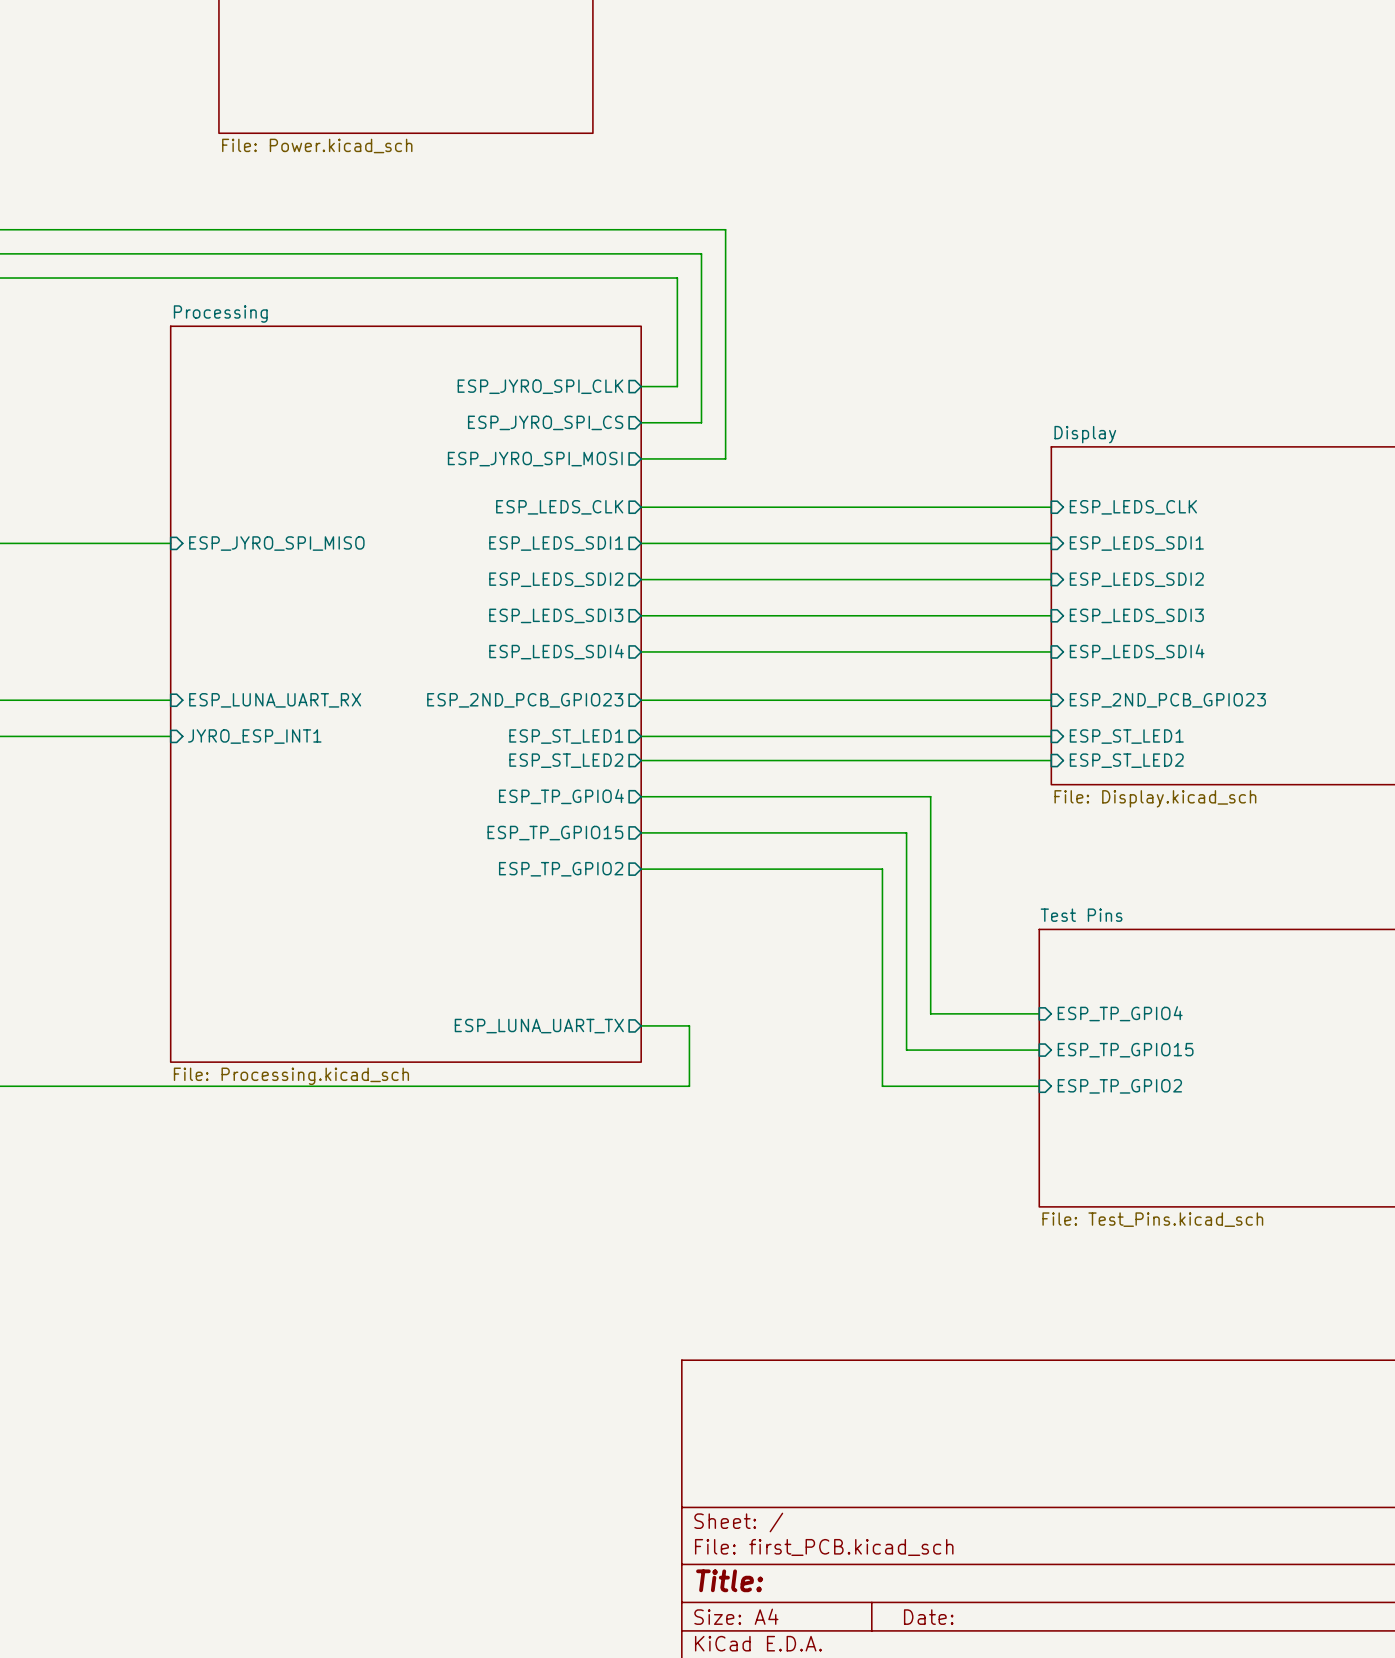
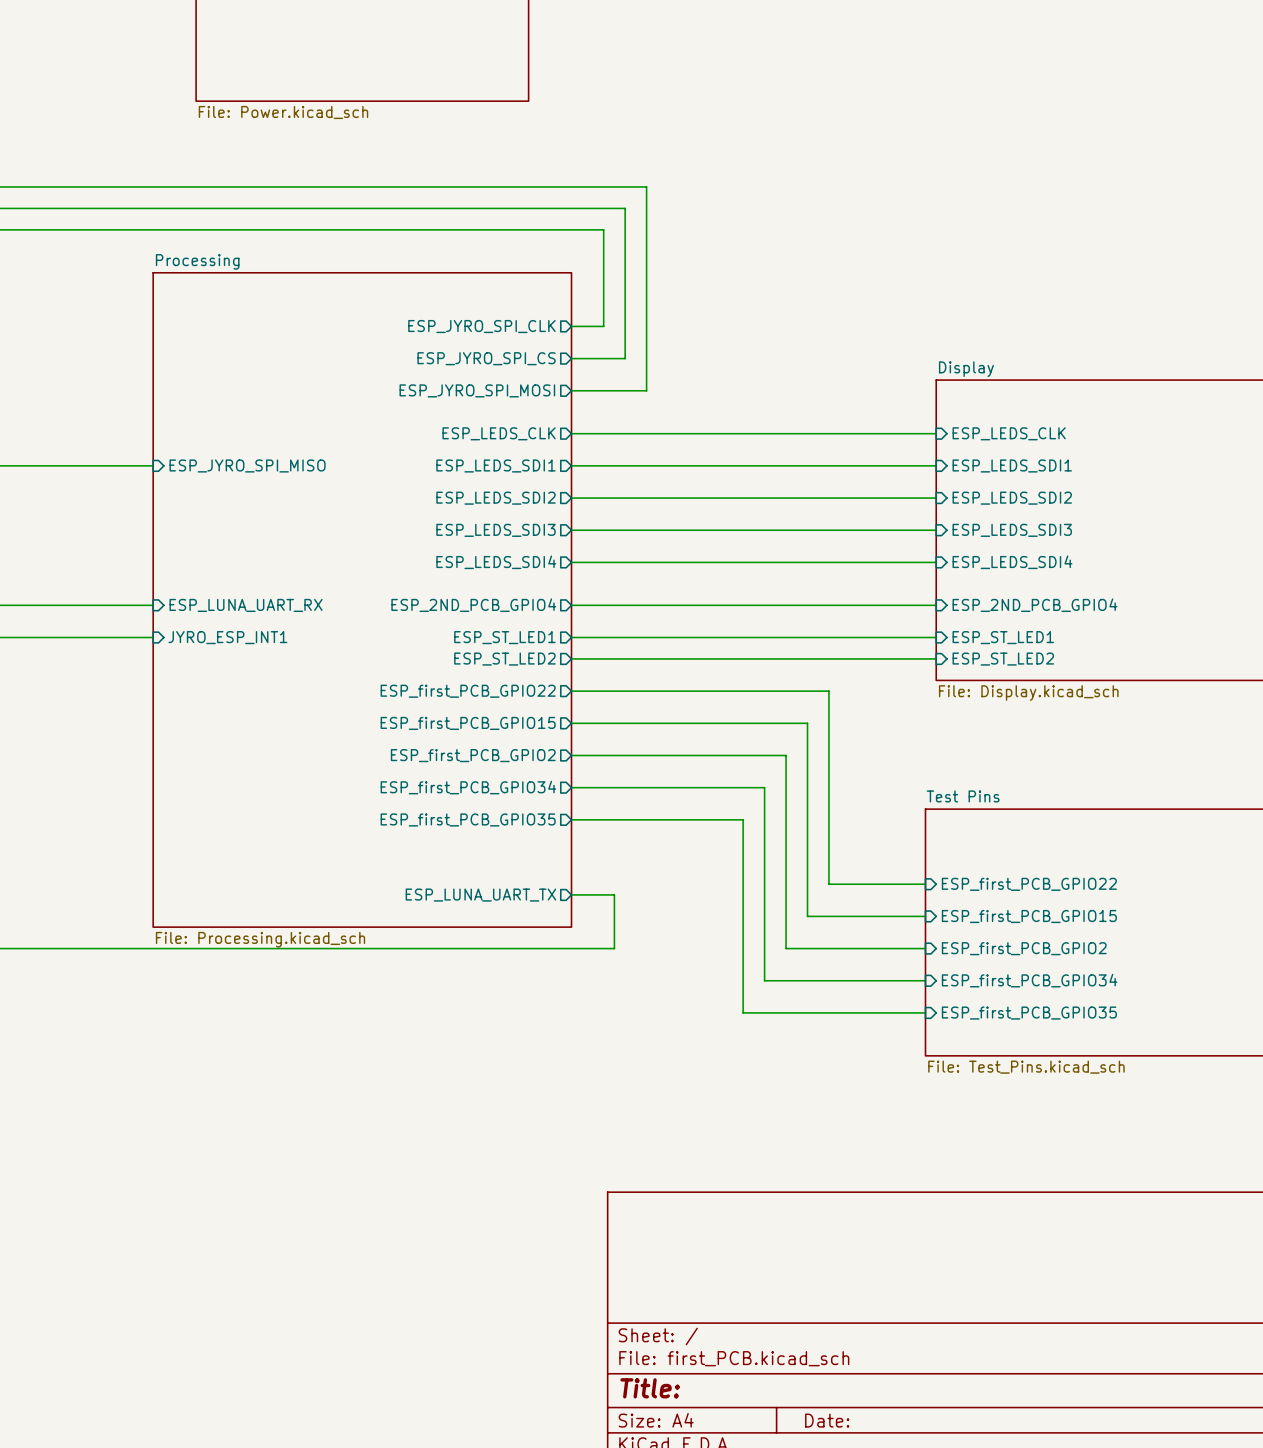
sheet pin: ESP_2ND_PCB_GPIO23 (525, 700) -> ESP_2ND_PCB_GPIO4 (473, 605)
sheet pin: ESP_2ND_PCB_GPIO23 (1167, 700) -> ESP_2ND_PCB_GPIO4 (1034, 605)
sheet pin: ESP_TP_GPIO4 (561, 796) -> ESP_first_PCB_GPIO22 (468, 691)
sheet pin: ESP_TP_GPIO15 (555, 833) -> ESP_first_PCB_GPIO15 (468, 723)
sheet pin: ESP_TP_GPIO2 (561, 869) -> ESP_first_PCB_GPIO2 (473, 755)
sheet pin: none -> ESP_first_PCB_GPIO34 (468, 787)
wire: none -> (571, 787) (764, 787) (764, 980) (925, 980)
sheet pin: none -> ESP_first_PCB_GPIO35 (468, 819)
wire: none -> (571, 819) (743, 819) (743, 1012) (925, 1012)
sheet pin: ESP_TP_GPIO4 (1120, 1013) -> ESP_first_PCB_GPIO22 (1029, 884)
sheet pin: ESP_TP_GPIO15 (1125, 1050) -> ESP_first_PCB_GPIO15 (1029, 916)
sheet pin: ESP_TP_GPIO2 (1119, 1086) -> ESP_first_PCB_GPIO2 (1024, 948)
sheet pin: none -> ESP_first_PCB_GPIO34 (1029, 980)
sheet pin: none -> ESP_first_PCB_GPIO35 (1029, 1013)

